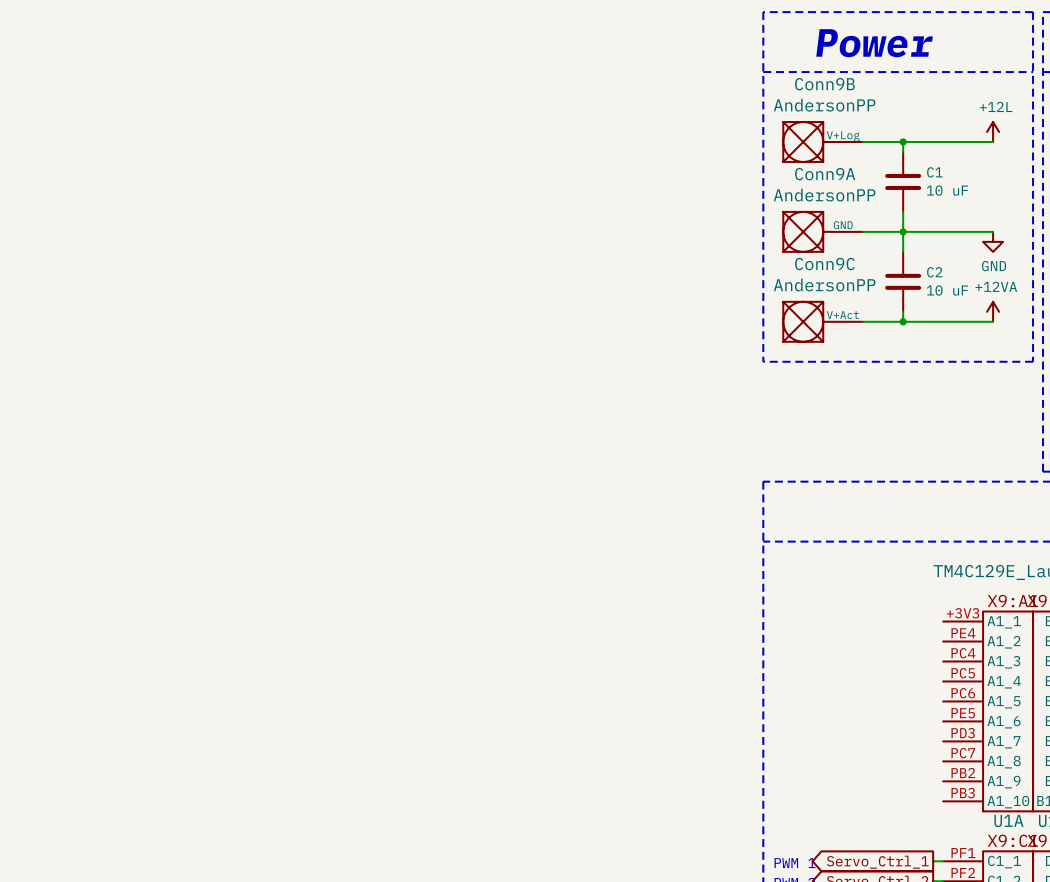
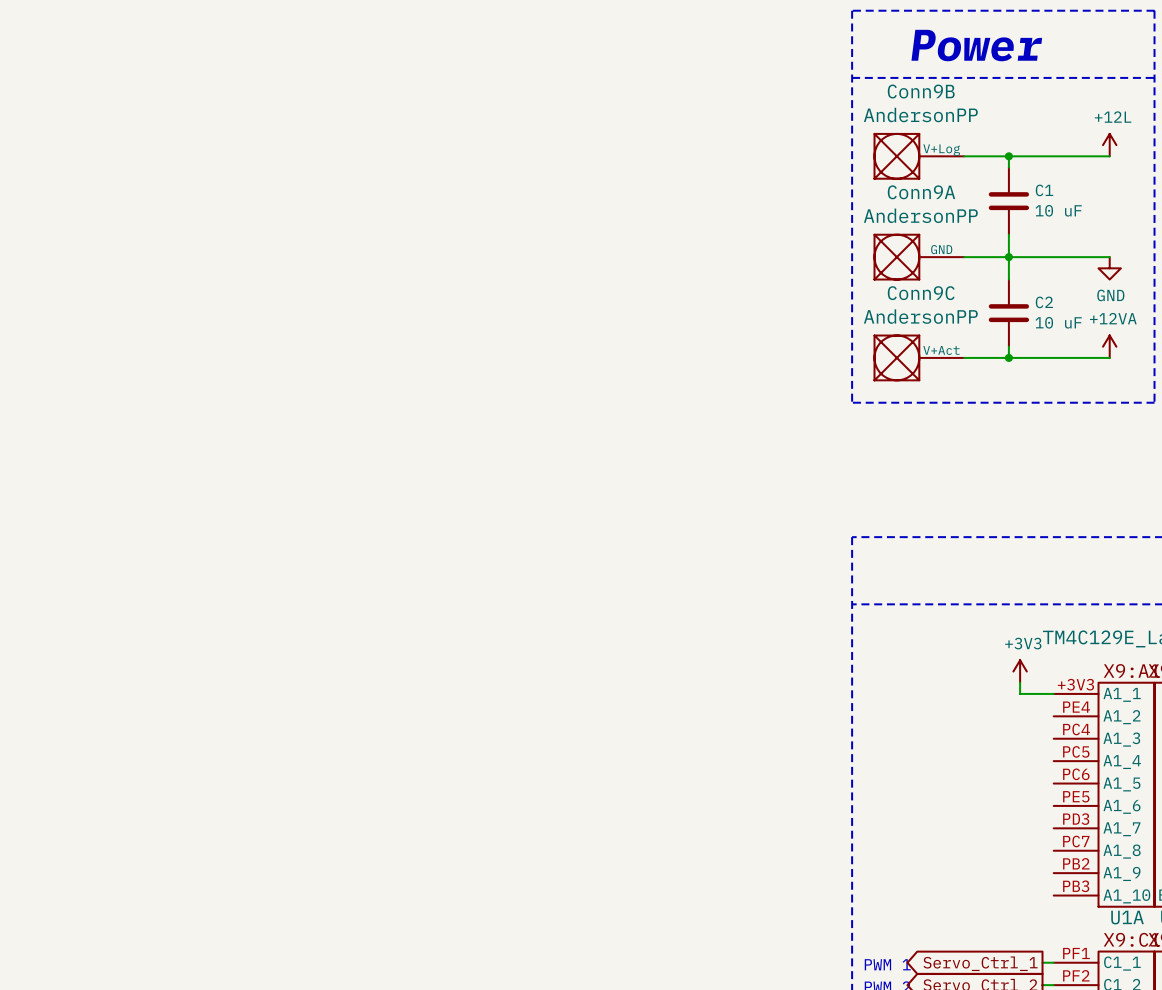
power symbol: none -> +3V3 (1020, 671)
wire: none -> (1020, 682) (1020, 693) (1053, 693)

